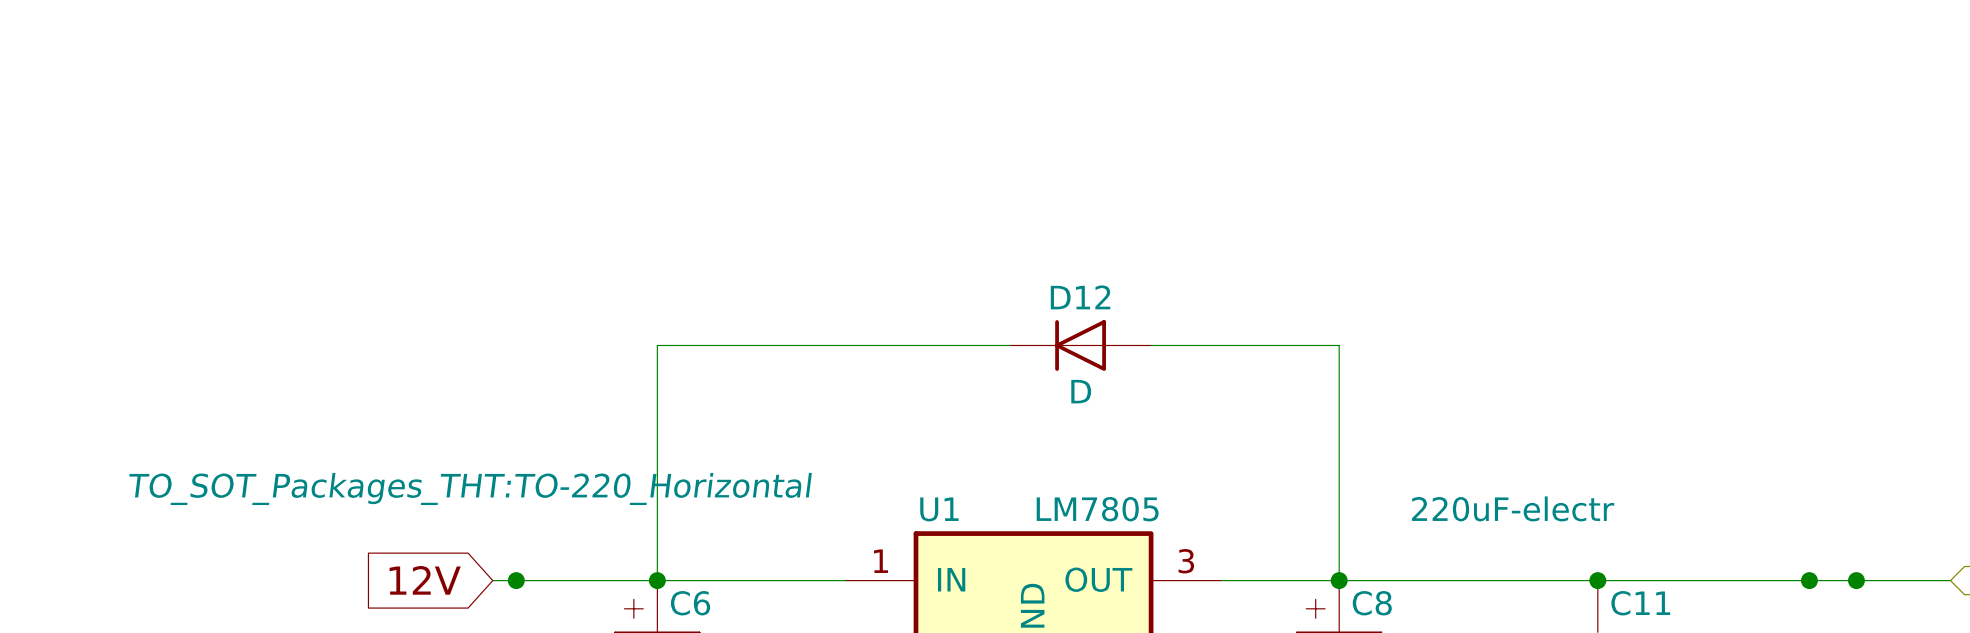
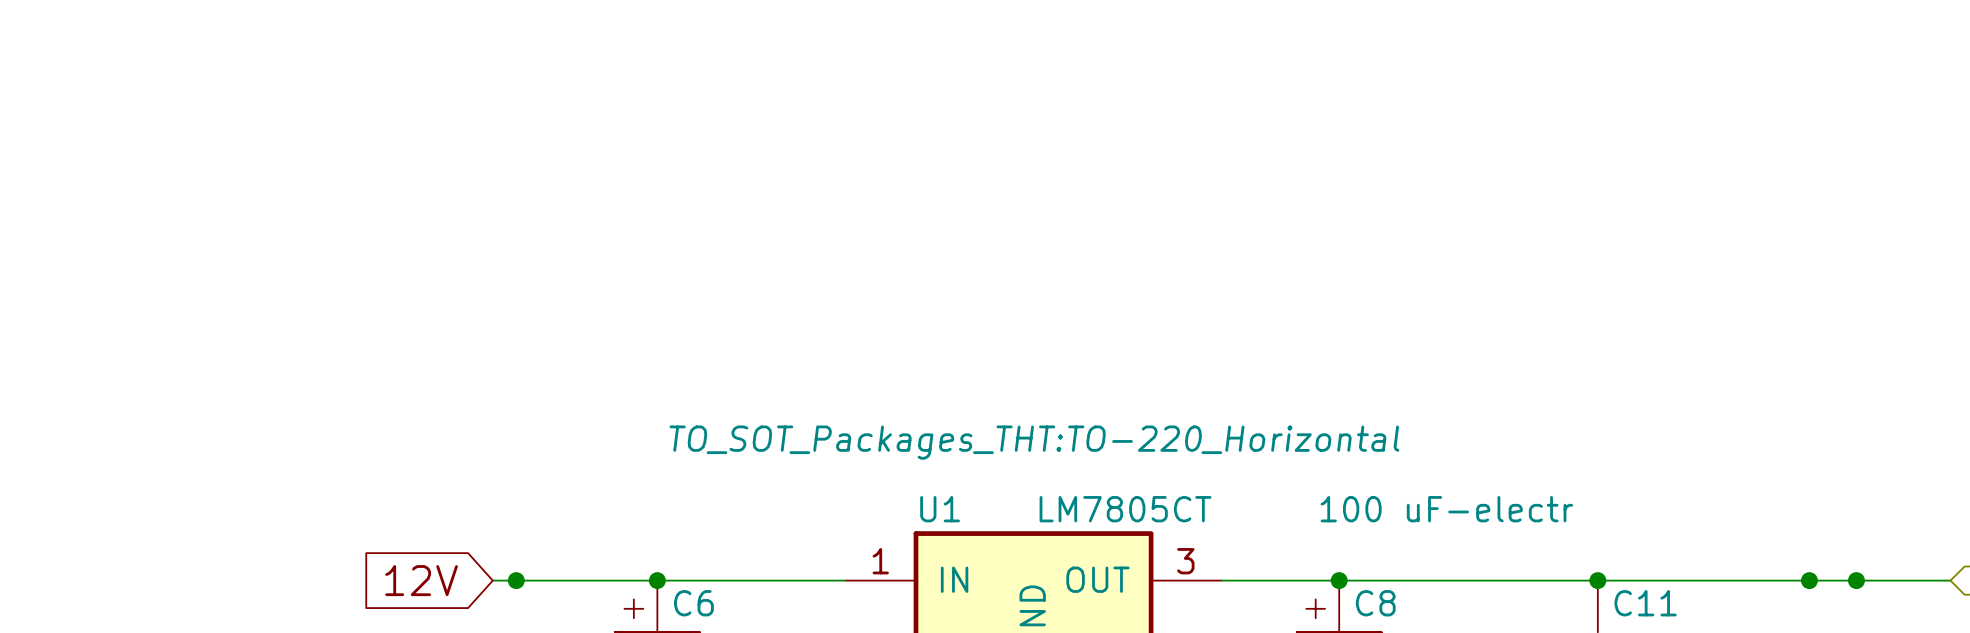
wire: (1010, 345) (657, 345) (657, 580) -> none
D12: D (1080, 345) -> none
wire: (1151, 345) (1339, 345) (1339, 580) -> none
U1 text position: TO_SOT_Packages_THT:TO-220_Horizontal (470, 488) -> TO_SOT_Packages_THT:TO-220_Horizontal (1034, 442)
C8 value: 220uF-electr (1513, 508) -> 100 uF-electr (1446, 509)
U1 value: LM7805 (1097, 509) -> LM7805CT (1125, 509)

